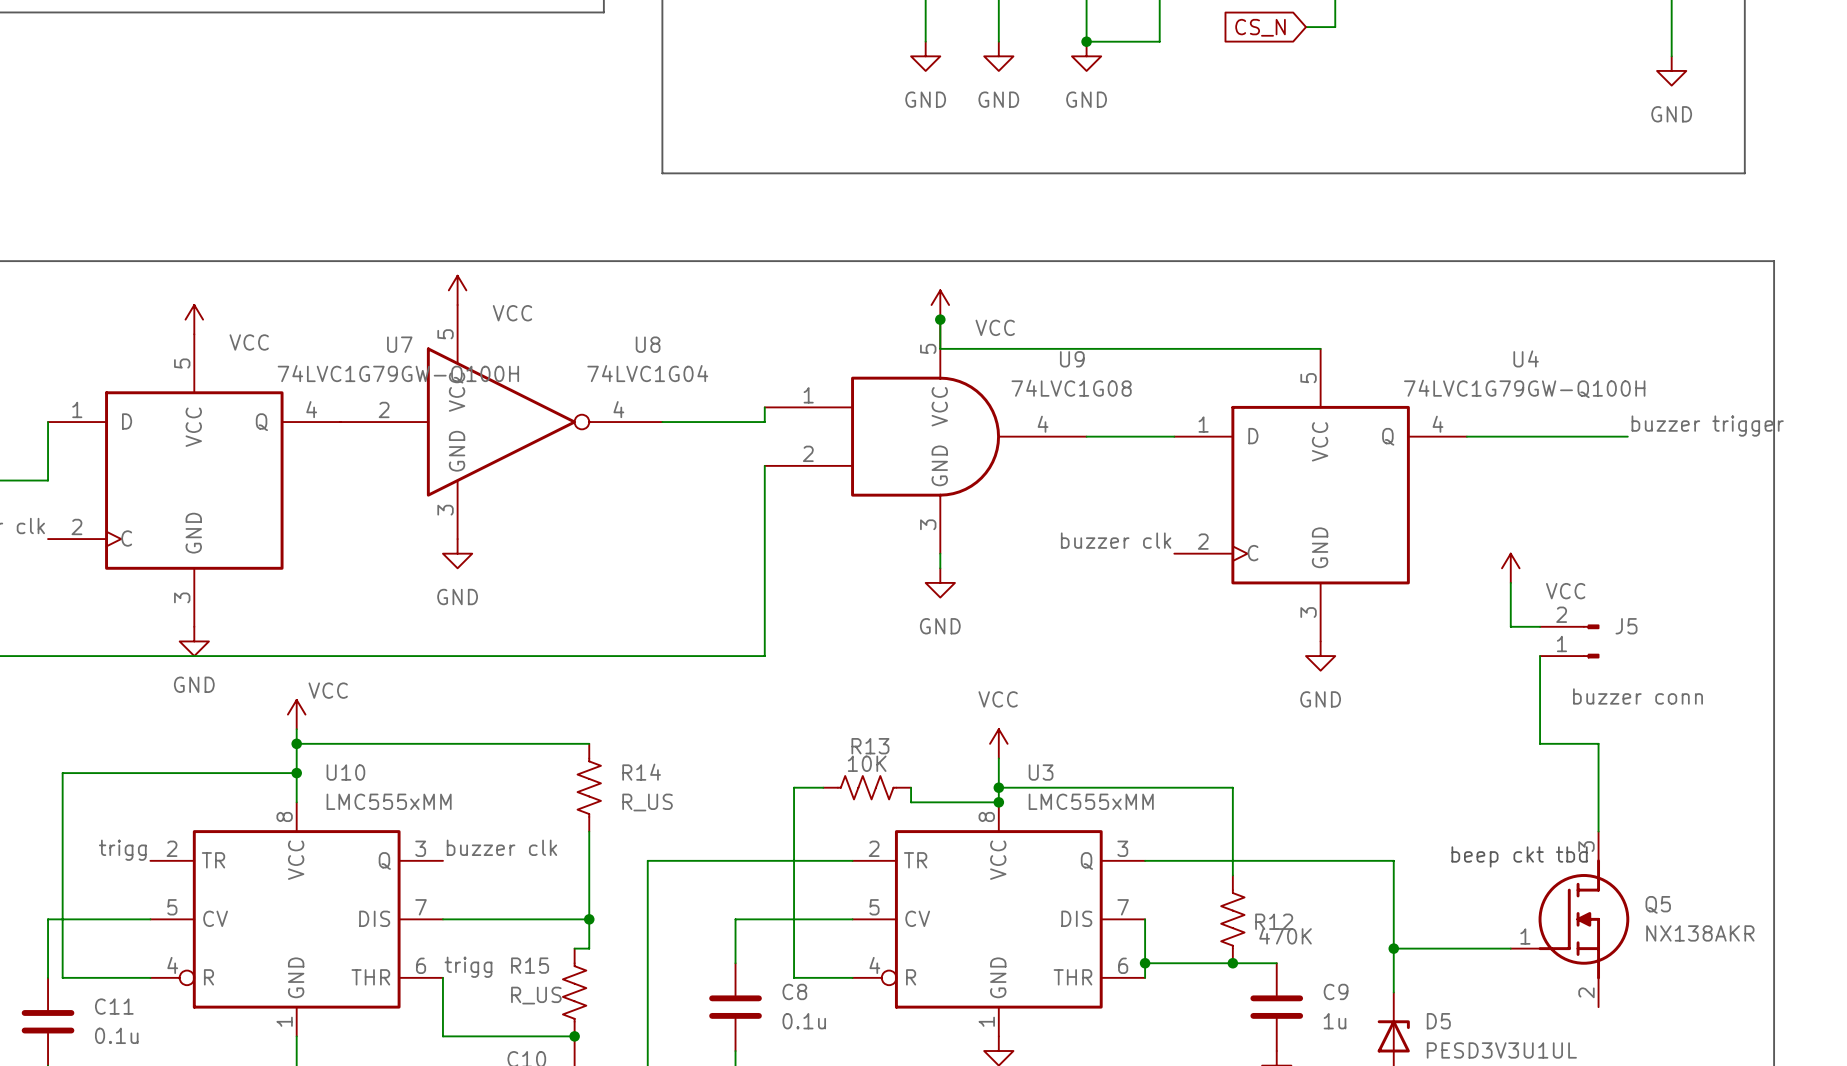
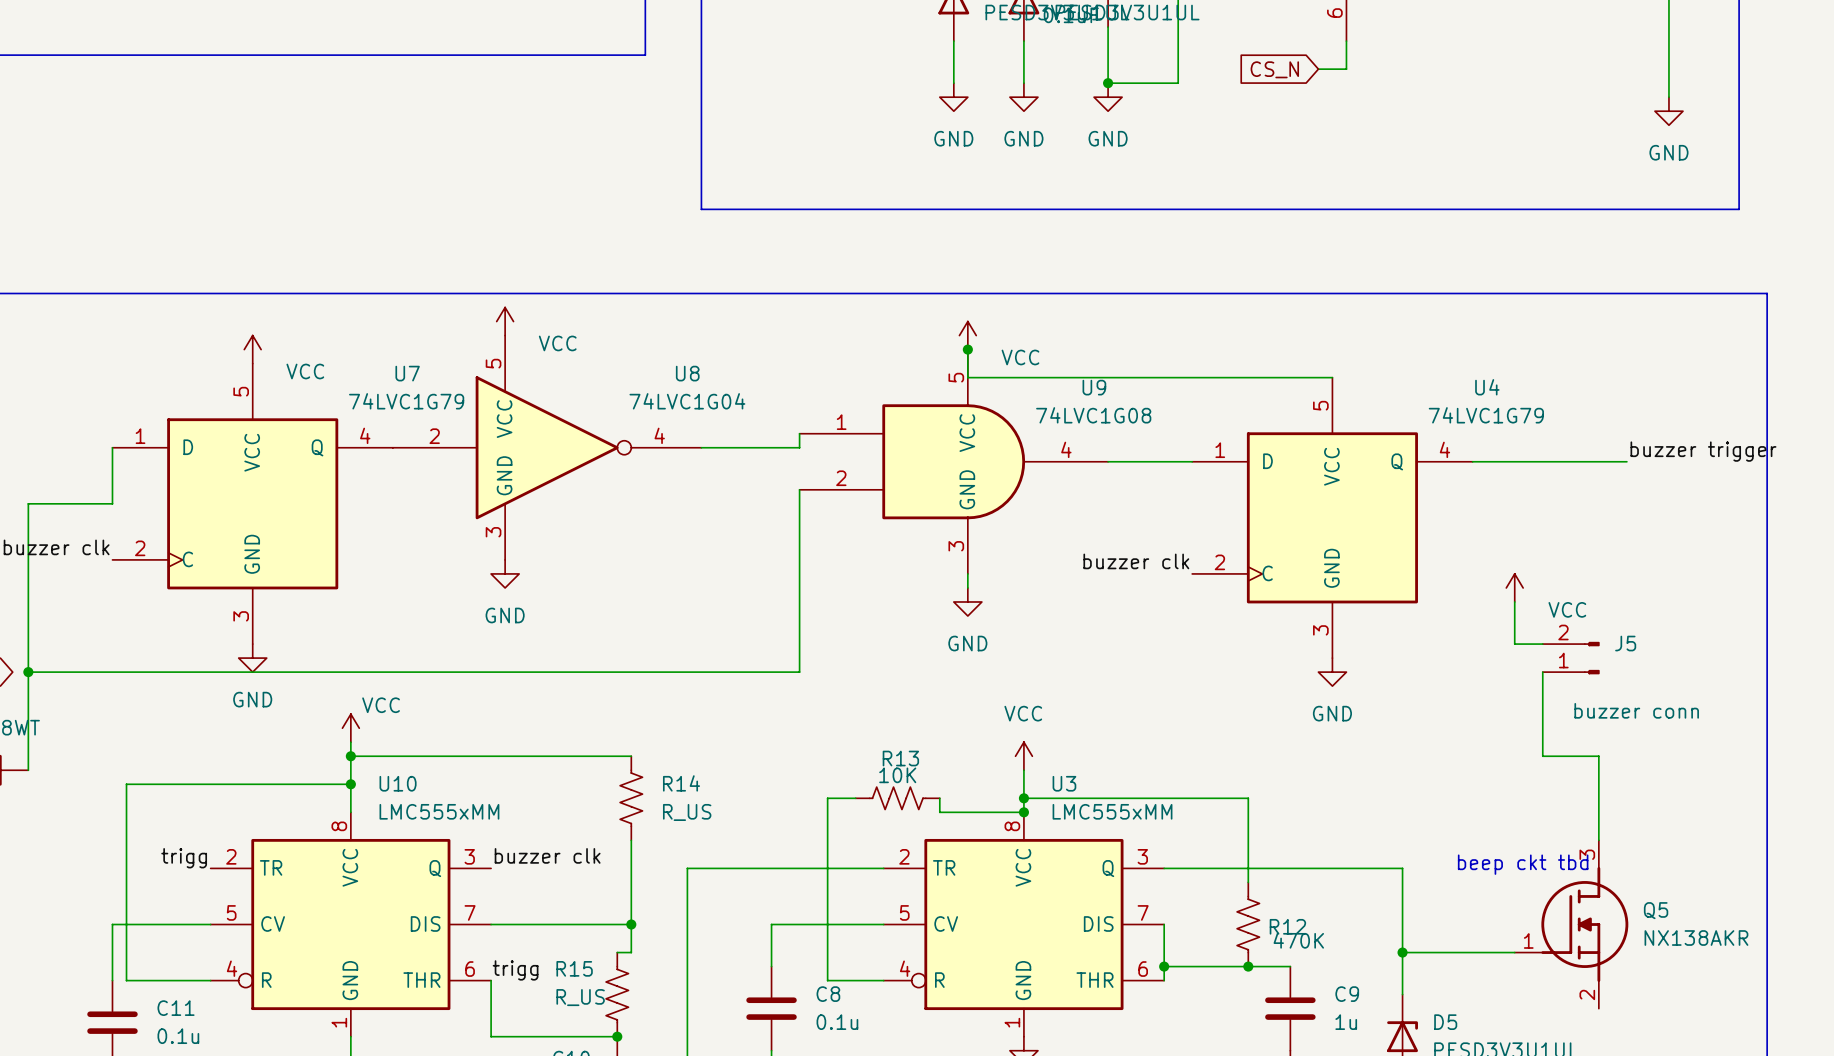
U7 name position: U7 (399, 344) -> U7 (407, 373)
U4 name position: U4 (1526, 358) -> U4 (1487, 387)
U7 value: 74LVC1G79GW-Q100H (398, 374) -> 74LVC1G79 (406, 401)
U4 value: 74LVC1G79GW-Q100H (1524, 388) -> 74LVC1G79 (1486, 415)

